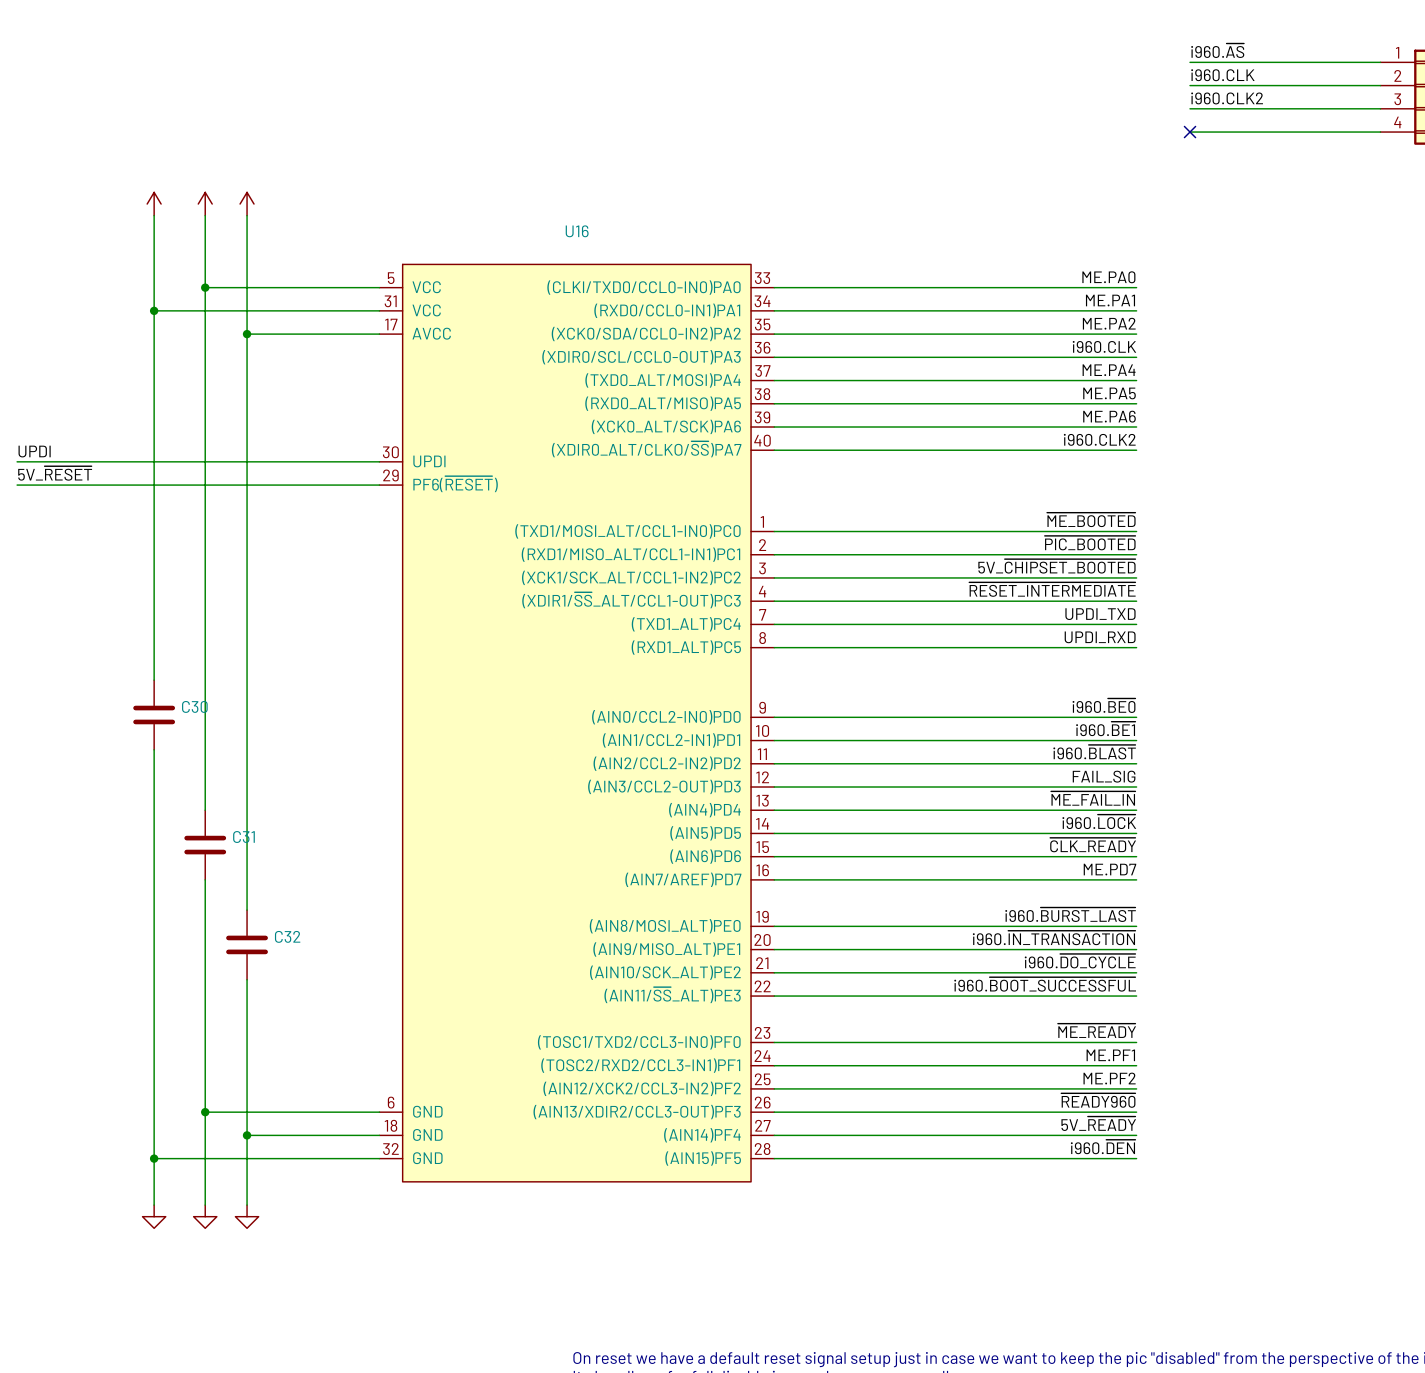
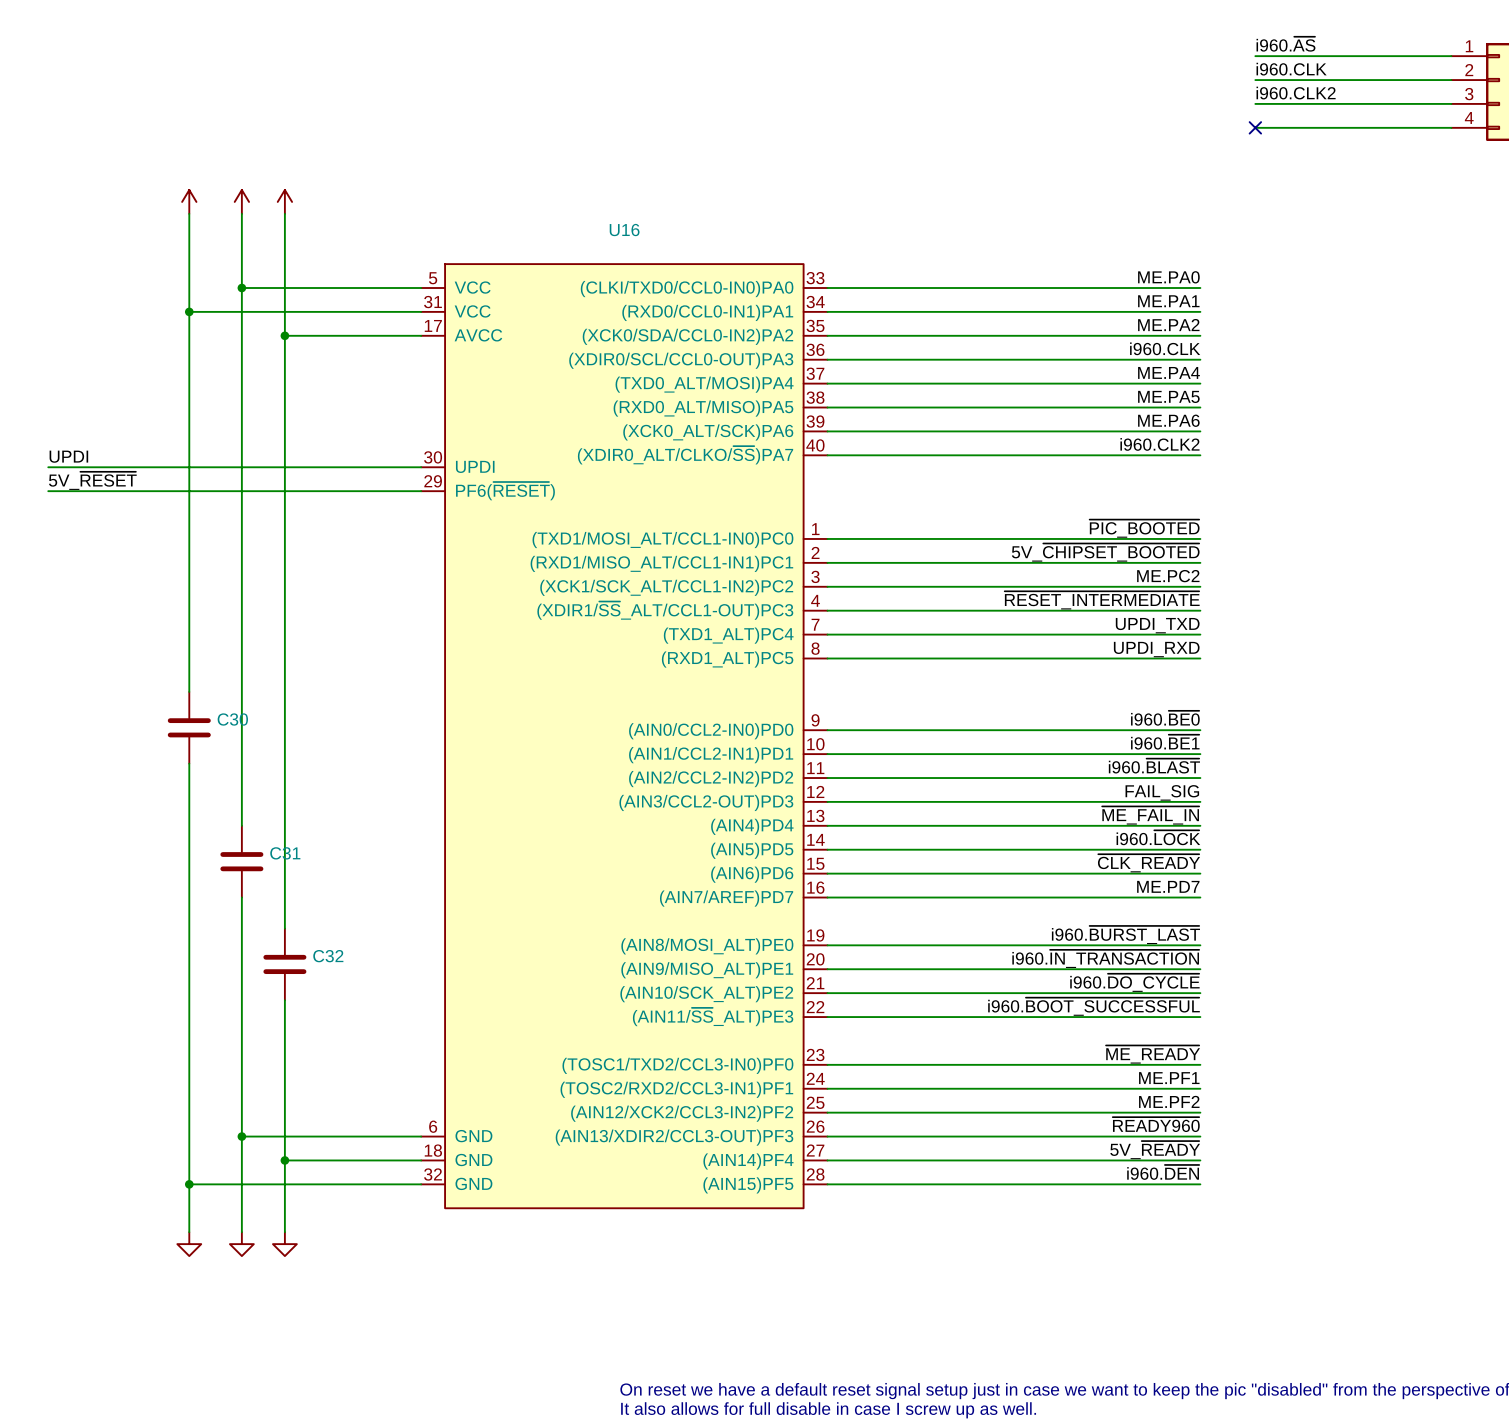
label: ~{ME_BOOTED} (1091, 519) -> ~{PIC_BOOTED} (1144, 528)
label: ~{PIC_BOOTED} (1090, 543) -> 5V_~{CHIPSET_BOOTED} (1105, 552)
label: 5V_~{CHIPSET_BOOTED} (1056, 566) -> ME.PC2 (1168, 576)

